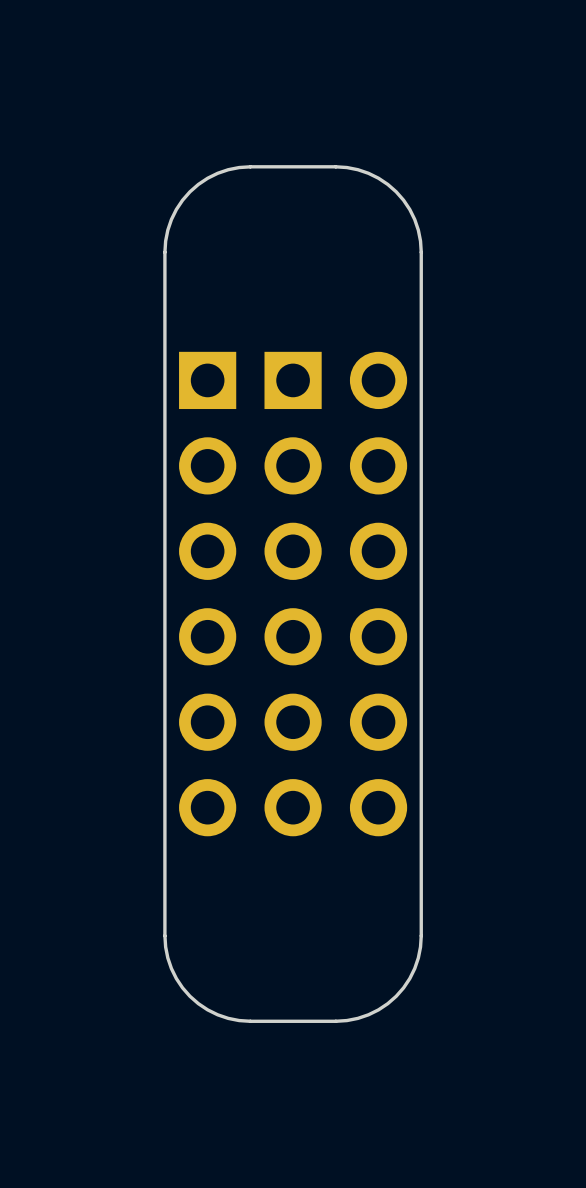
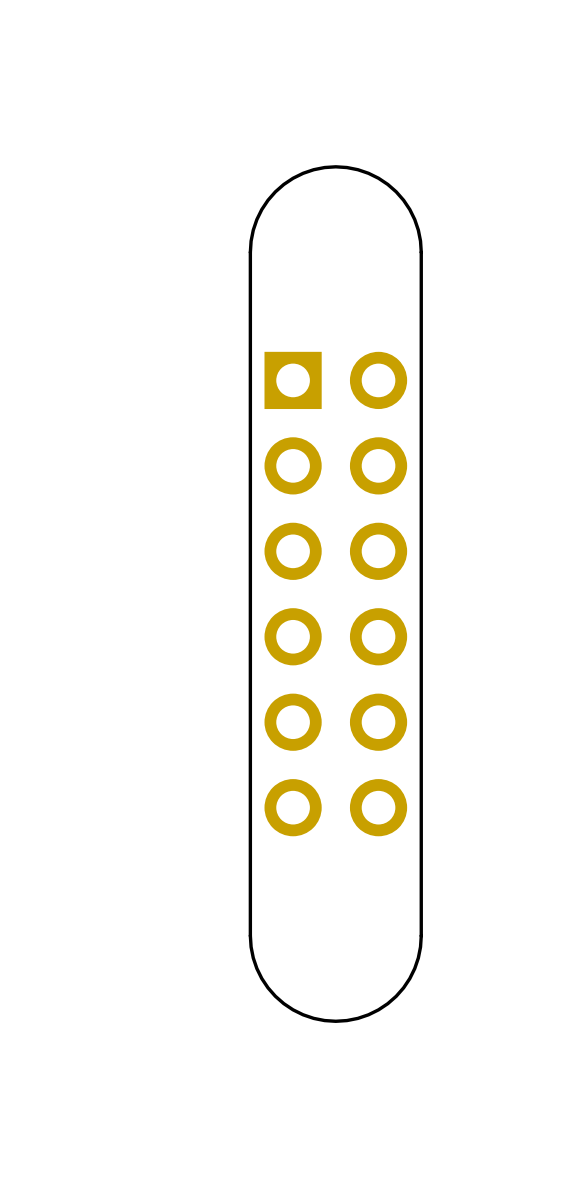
board edge: (421, 252) (414, 219) (396, 191) (368, 173) (335, 166) (239, 167) (207, 178) (189, 191) (176, 209) (167, 230) (164, 252) (164, 935) (171, 968) (189, 996) (207, 1009) (228, 1018) (250, 1021) (346, 1020) (378, 1009) (403, 987) (418, 957) (421, 935) -> (421, 252) (414, 219) (396, 191) (368, 173) (335, 166) (303, 173) (275, 191) (256, 219) (250, 252) (250, 935) (253, 957) (268, 987) (283, 1003) (313, 1018) (346, 1020) (378, 1009) (403, 987) (418, 957) (421, 935)
part: (207, 594) -> none

